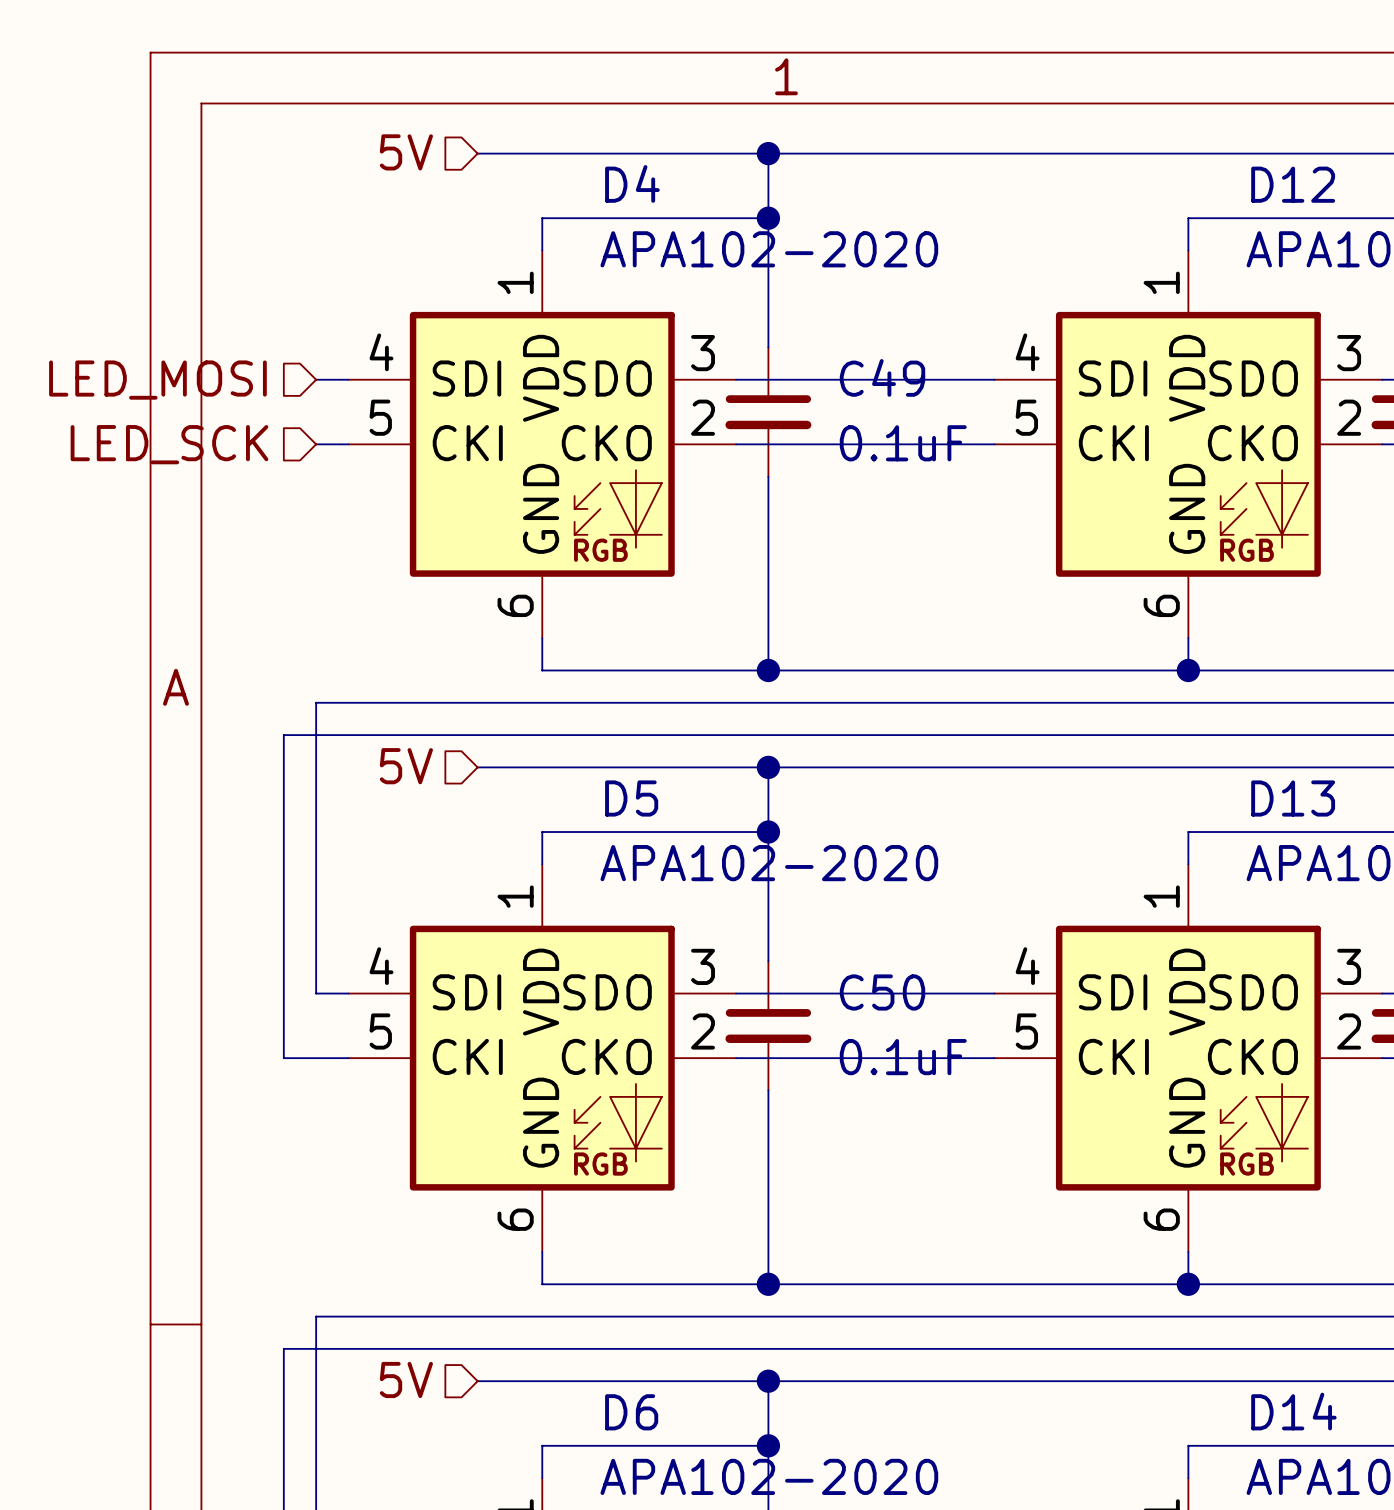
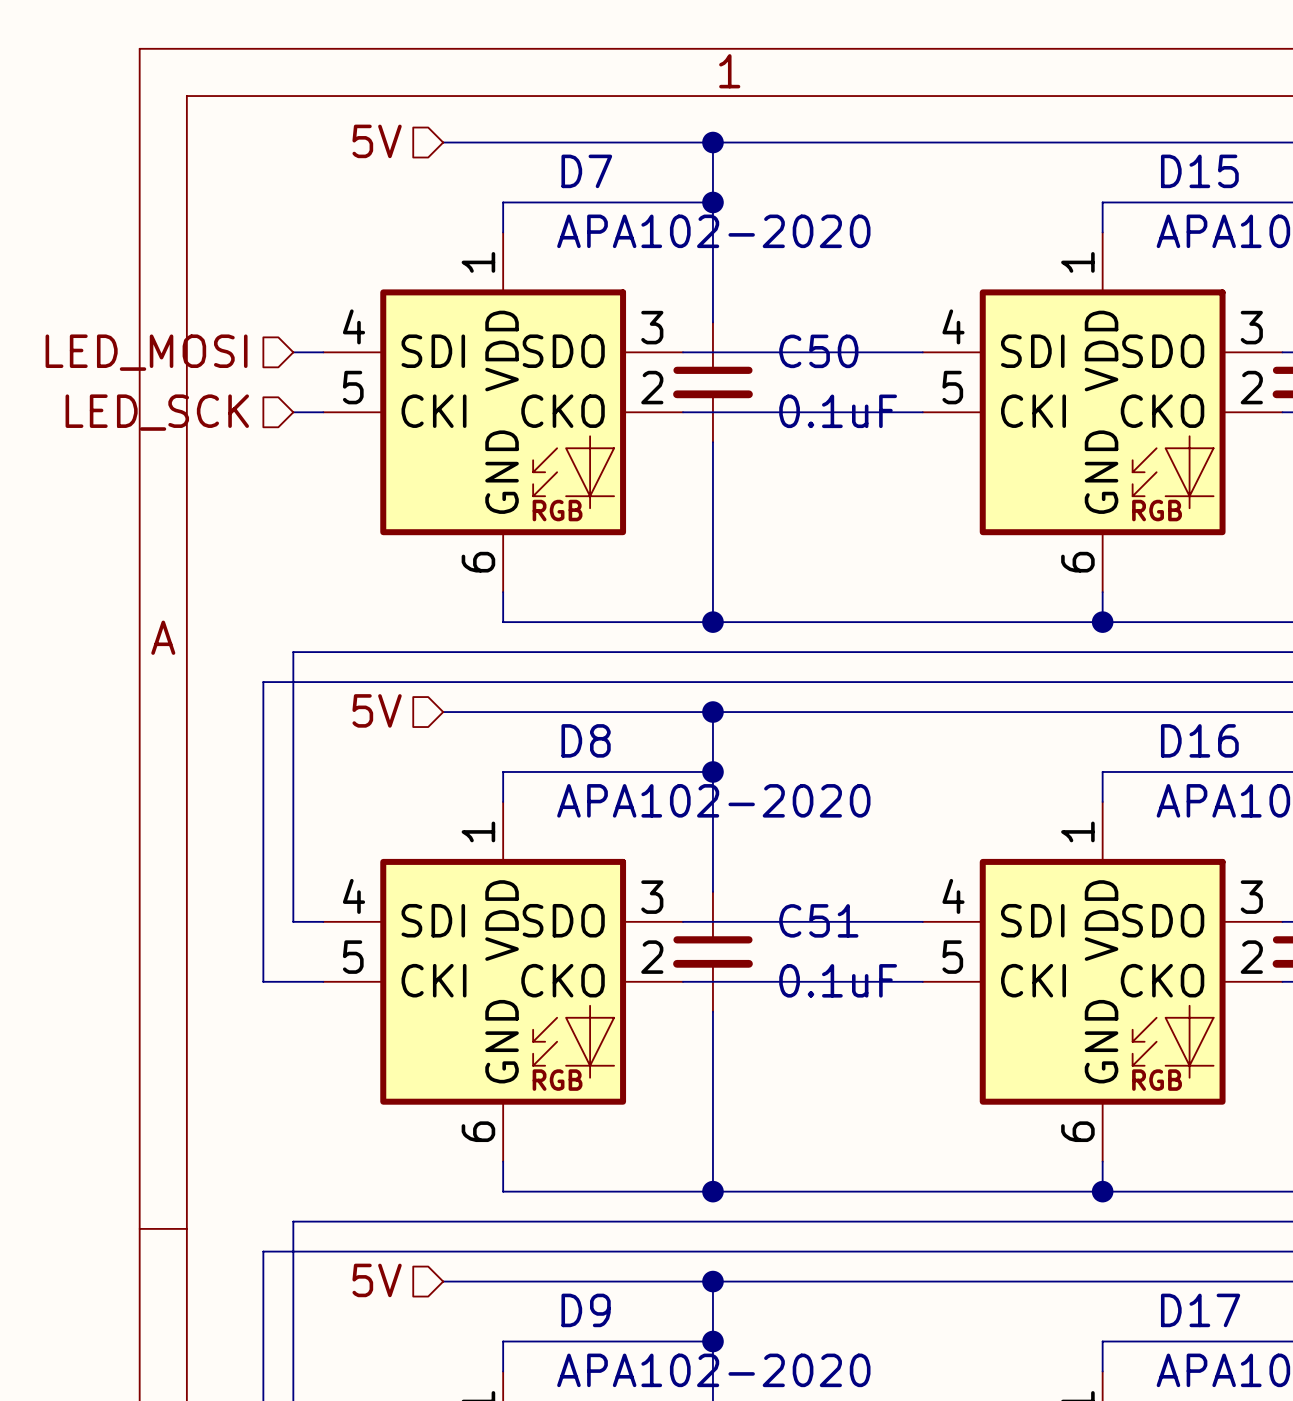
D4 name: D4 (632, 183) -> D7 (586, 171)
D12 name: D12 (1293, 184) -> D15 (1199, 171)
C49 name: C49 (882, 377) -> C50 (818, 351)
D5 name: D5 (631, 798) -> D8 (586, 740)
D13 name: D13 (1293, 798) -> D16 (1199, 740)
C50 name: C50 (882, 992) -> C51 (818, 920)
D14 name: D14 (1293, 1411) -> D17 (1200, 1310)
D6 name: D6 (631, 1412) -> D9 (586, 1310)

